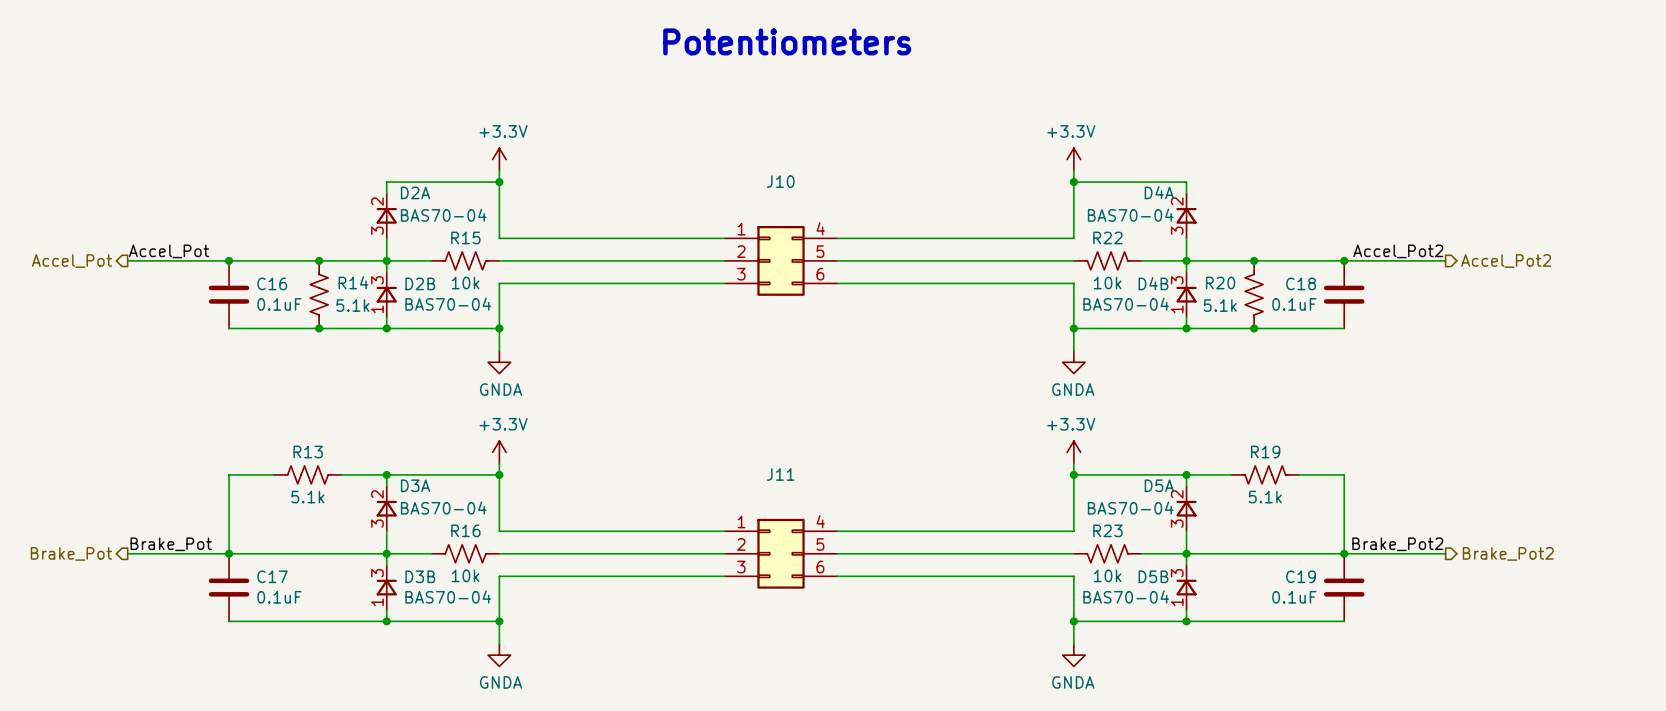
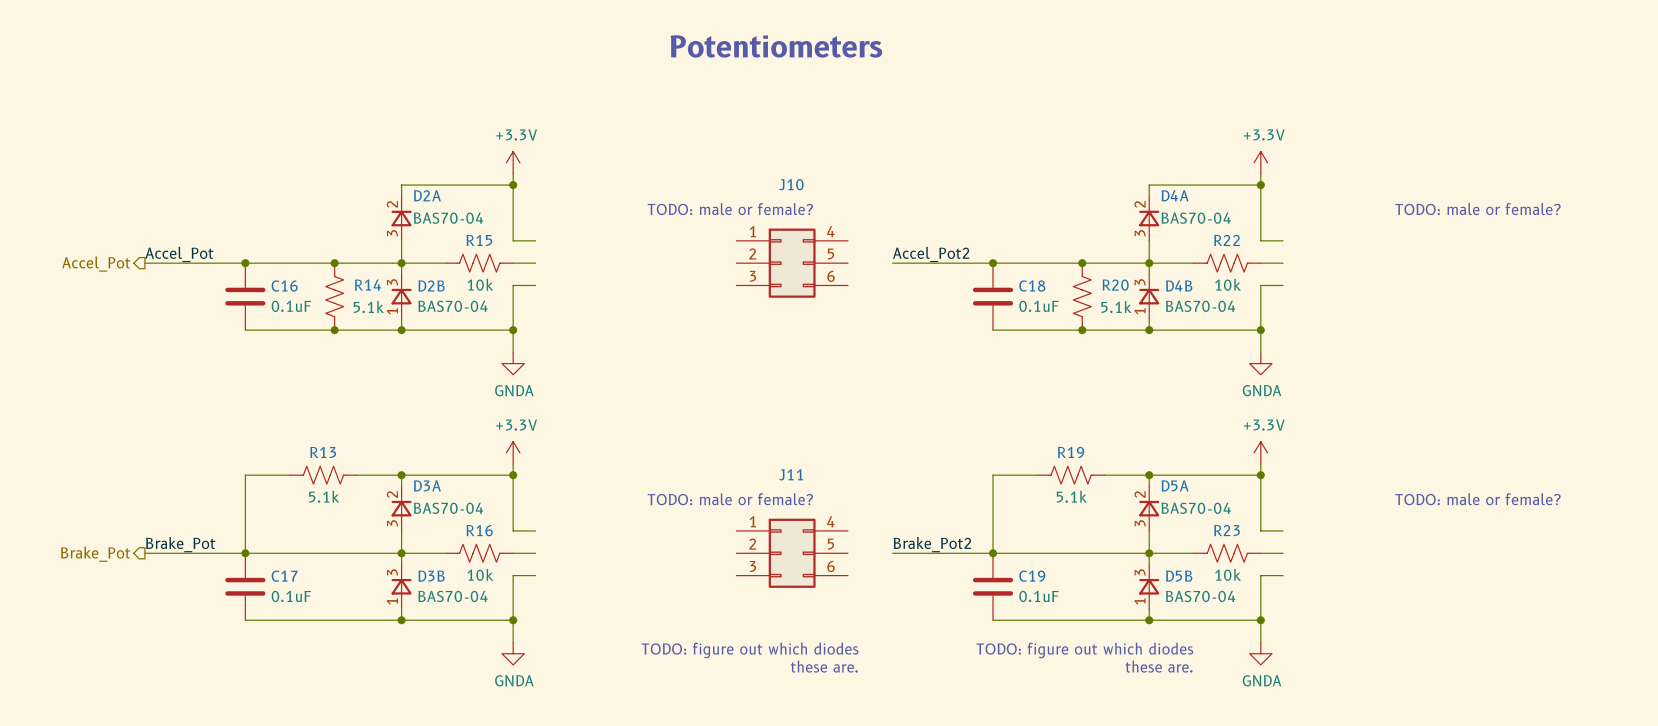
power symbol: +3.3V (1073, 159) -> none
power symbol: none -> +3.3V (1260, 162)
wire: (1073, 170) (1073, 238) (837, 238) -> none
wire: none -> (1260, 173) (1260, 240) (1283, 240)
wire: (1073, 182) (1141, 182) -> (1149, 196) (1149, 185)
junction: (1073, 182) -> none
wire: (1186, 182) (1186, 193) -> (1193, 185) (1260, 185)
junction: none -> (1260, 185)
D4A name position: D4A (1159, 192) -> D4A (1175, 195)
text: none -> TODO: male or female? (730, 209)
text: none -> TODO: male or female? (1477, 209)
D4A value position: BAS70-04 (1130, 215) -> BAS70-04 (1196, 218)
D4A position: (1186, 215) -> (1149, 218)
wire: (521, 238) (724, 238) -> none
wire: (1186, 238) (1186, 272) -> (1149, 240) (1149, 274)
label: none -> Accel_Pot2 (931, 254)
label: Accel_Pot2 (1398, 251) -> none
wire: (521, 260) (724, 260) -> none
wire: (837, 260) (882, 260) -> none
junction: none -> (993, 263)
junction: none -> (1082, 263)
R22 flip: as is (1107, 260) -> left-right (1227, 263)
R22 position: (1107, 260) -> (1227, 263)
junction: none -> (1149, 263)
junction: (1186, 260) -> none
junction: (1254, 260) -> none
wire: (1276, 260) (1445, 260) -> none
junction: (1344, 260) -> none
hierarchical label: Accel_Pot2 (1506, 261) -> none
wire: (521, 283) (724, 283) -> none
wire: (837, 283) (1073, 283) (1073, 351) -> none
D4B name position: D4B (1153, 283) -> D4B (1179, 285)
wire: none -> (1283, 285) (1260, 285) (1260, 352)
C18 name position: C18 (1301, 283) -> C18 (1032, 286)
D4B position: (1186, 294) -> (1149, 296)
R20 flip: as is (1254, 294) -> left-right (1082, 296)
R20 position: (1254, 294) -> (1082, 296)
C18 position: (1344, 294) -> (993, 296)
D4B value position: BAS70-04 (1126, 304) -> BAS70-04 (1200, 306)
C18 value position: 0.1uF (1294, 304) -> 0.1uF (1038, 306)
wire: (1186, 317) (1186, 328) -> (1149, 318) (1149, 330)
wire: none -> (993, 330) (1082, 330)
junction: none -> (1149, 330)
junction: (1186, 328) -> none
wire: (1254, 328) (1344, 328) -> none
power symbol: GNDA (1073, 362) -> none
power symbol: none -> GNDA (1260, 363)
power symbol: +3.3V (1073, 452) -> none
power symbol: none -> +3.3V (1260, 452)
wire: (1073, 463) (1073, 531) (837, 531) -> none
wire: none -> (1260, 464) (1260, 530) (1283, 530)
wire: none -> (1037, 475) (993, 475) (993, 553)
junction: (1073, 474) -> none
junction: none -> (1149, 475)
wire: (1186, 474) (1186, 486) -> (1149, 475) (1149, 486)
junction: (1186, 474) -> none
junction: none -> (1260, 475)
R19 flip: as is (1265, 474) -> left-right (1071, 475)
R19 position: (1265, 474) -> (1071, 475)
wire: (1299, 474) (1344, 474) (1344, 553) -> none
D5A name position: D5A (1159, 485) -> D5A (1175, 485)
text: none -> TODO: male or female? (730, 499)
text: none -> TODO: male or female? (1477, 499)
D5A value position: BAS70-04 (1130, 508) -> BAS70-04 (1196, 508)
D5A position: (1186, 508) -> (1149, 508)
wire: (521, 531) (724, 531) -> none
wire: (1186, 531) (1186, 565) -> (1149, 530) (1149, 564)
label: none -> Brake_Pot2 (932, 544)
label: Brake_Pot2 (1397, 544) -> none
wire: (521, 553) (724, 553) -> none
wire: (837, 553) (882, 553) -> none
junction: none -> (993, 553)
R23 flip: as is (1107, 553) -> left-right (1227, 553)
R23 position: (1107, 553) -> (1227, 553)
junction: none -> (1149, 553)
junction: (1186, 553) -> none
wire: (1276, 553) (1445, 553) -> none
junction: (1344, 553) -> none
hierarchical label: Brake_Pot2 (1508, 553) -> none
wire: (521, 576) (724, 576) -> none
wire: (837, 576) (1073, 576) (1073, 643) -> none
D5B name position: D5B (1153, 576) -> D5B (1179, 576)
wire: none -> (1283, 575) (1260, 575) (1260, 642)
C19 name position: C19 (1301, 576) -> C19 (1032, 576)
D5B position: (1186, 587) -> (1149, 586)
C19 position: (1344, 587) -> (993, 586)
D5B value position: BAS70-04 (1126, 597) -> BAS70-04 (1200, 596)
C19 value position: 0.1uF (1294, 597) -> 0.1uF (1038, 596)
wire: (1186, 610) (1186, 621) -> (1149, 609) (1149, 620)
wire: none -> (993, 620) (1082, 620)
junction: (1073, 621) -> none
junction: none -> (1149, 620)
junction: (1186, 621) -> none
wire: (1254, 621) (1344, 621) -> none
junction: none -> (1260, 620)
text: none -> TODO: figure out which diodes (750, 650)
text: none -> TODO: figure out which diodes (1084, 650)
power symbol: GNDA (1073, 655) -> none
power symbol: none -> GNDA (1260, 653)
text: none -> these are. (824, 666)
text: none -> these are. (1159, 666)

